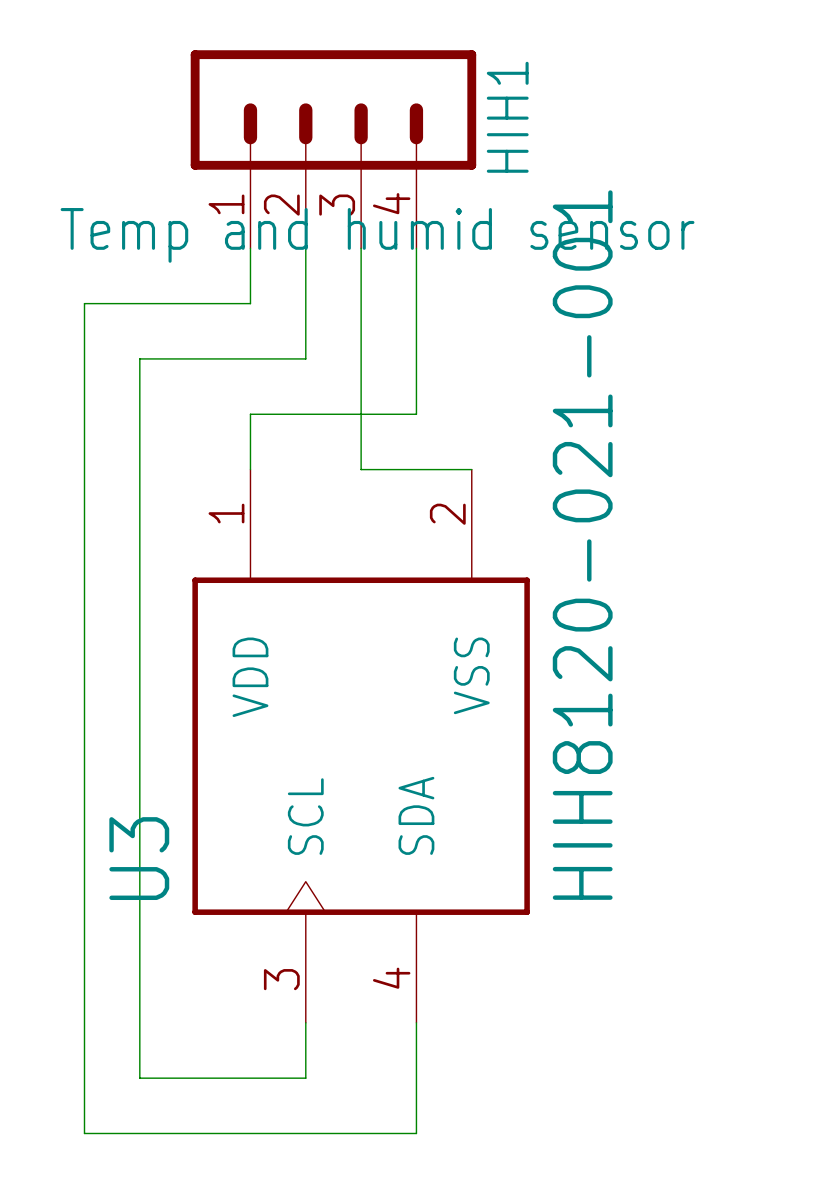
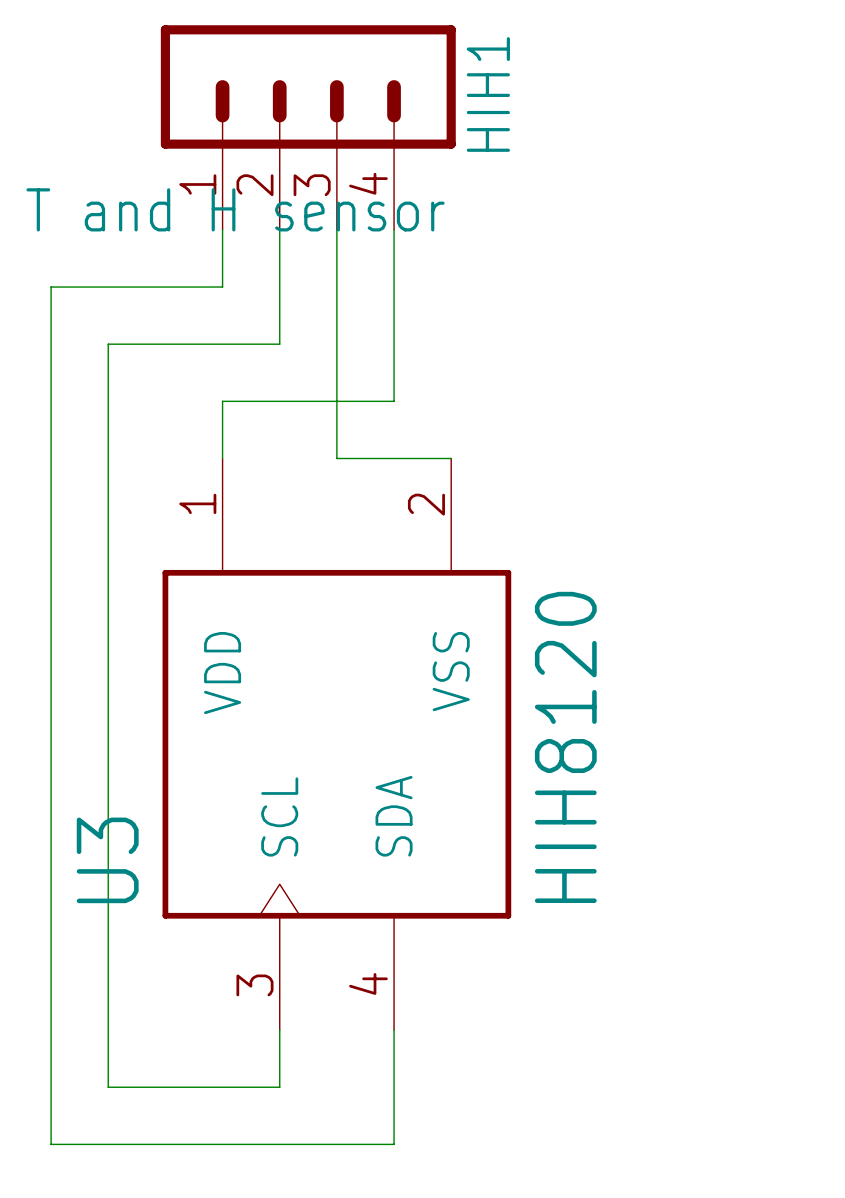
HIH1 value: Temp and humid sensor (377, 235) -> T and H sensor (235, 209)
U3 value: HIH8120-021-001 (582, 545) -> HIH8120 (565, 747)

